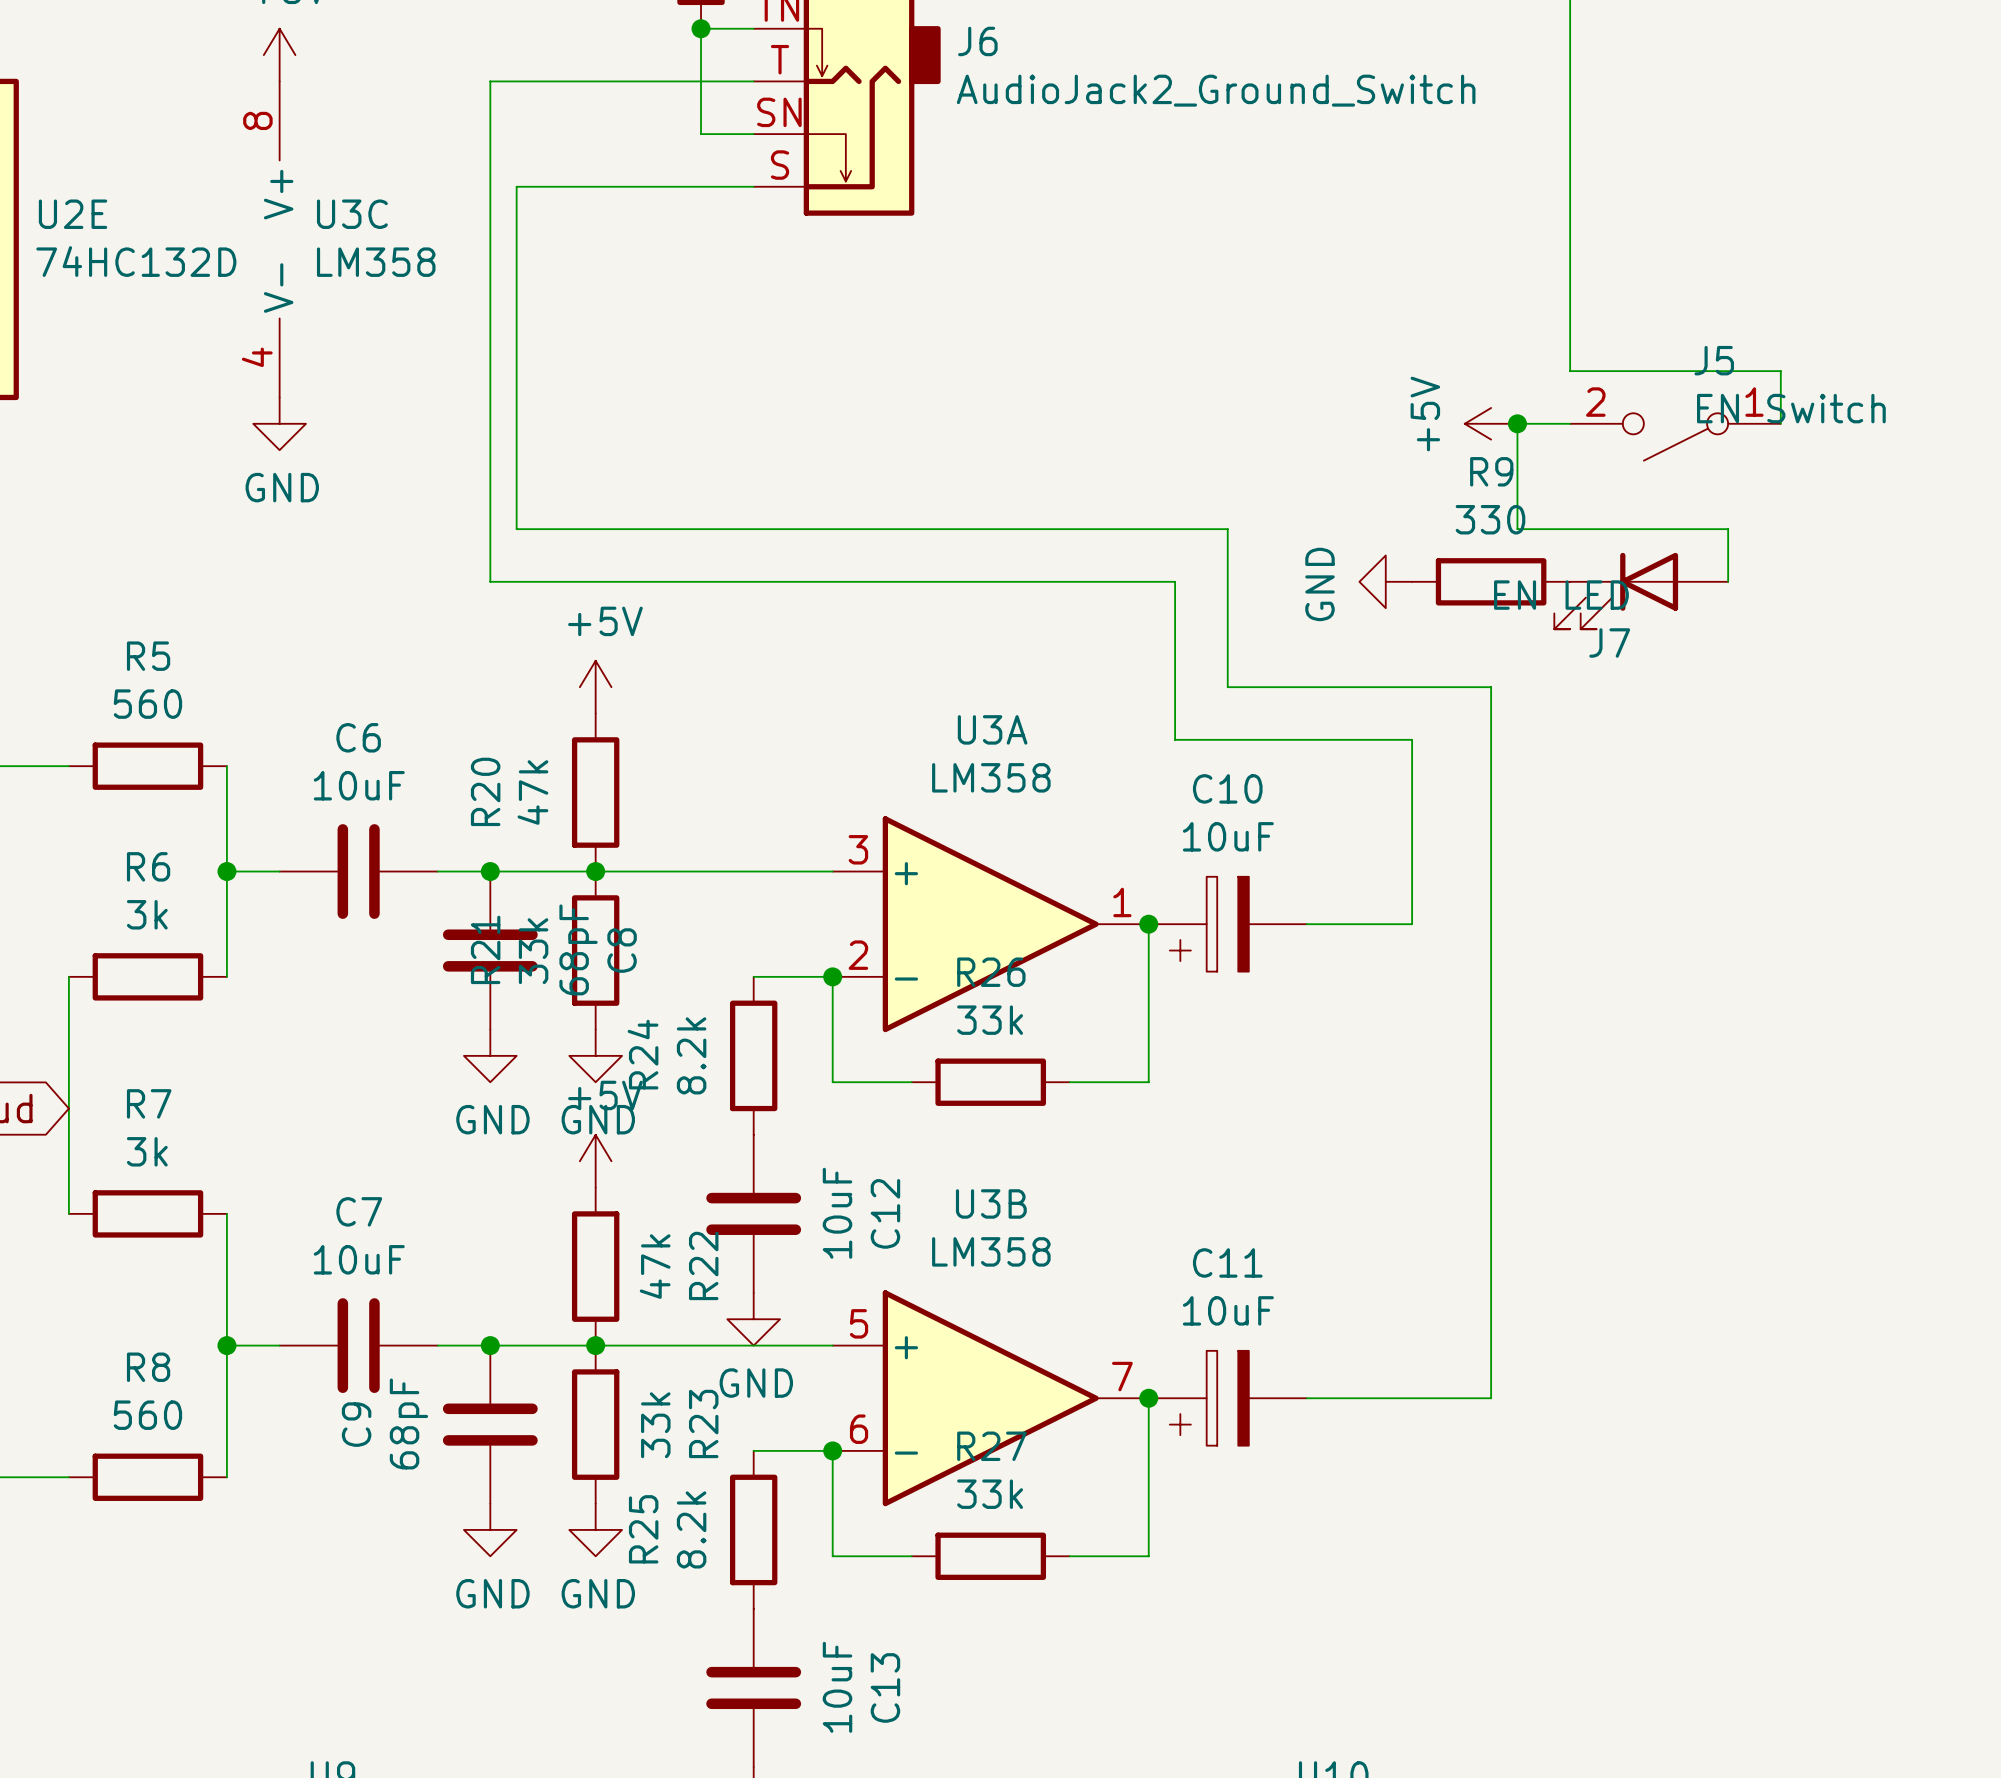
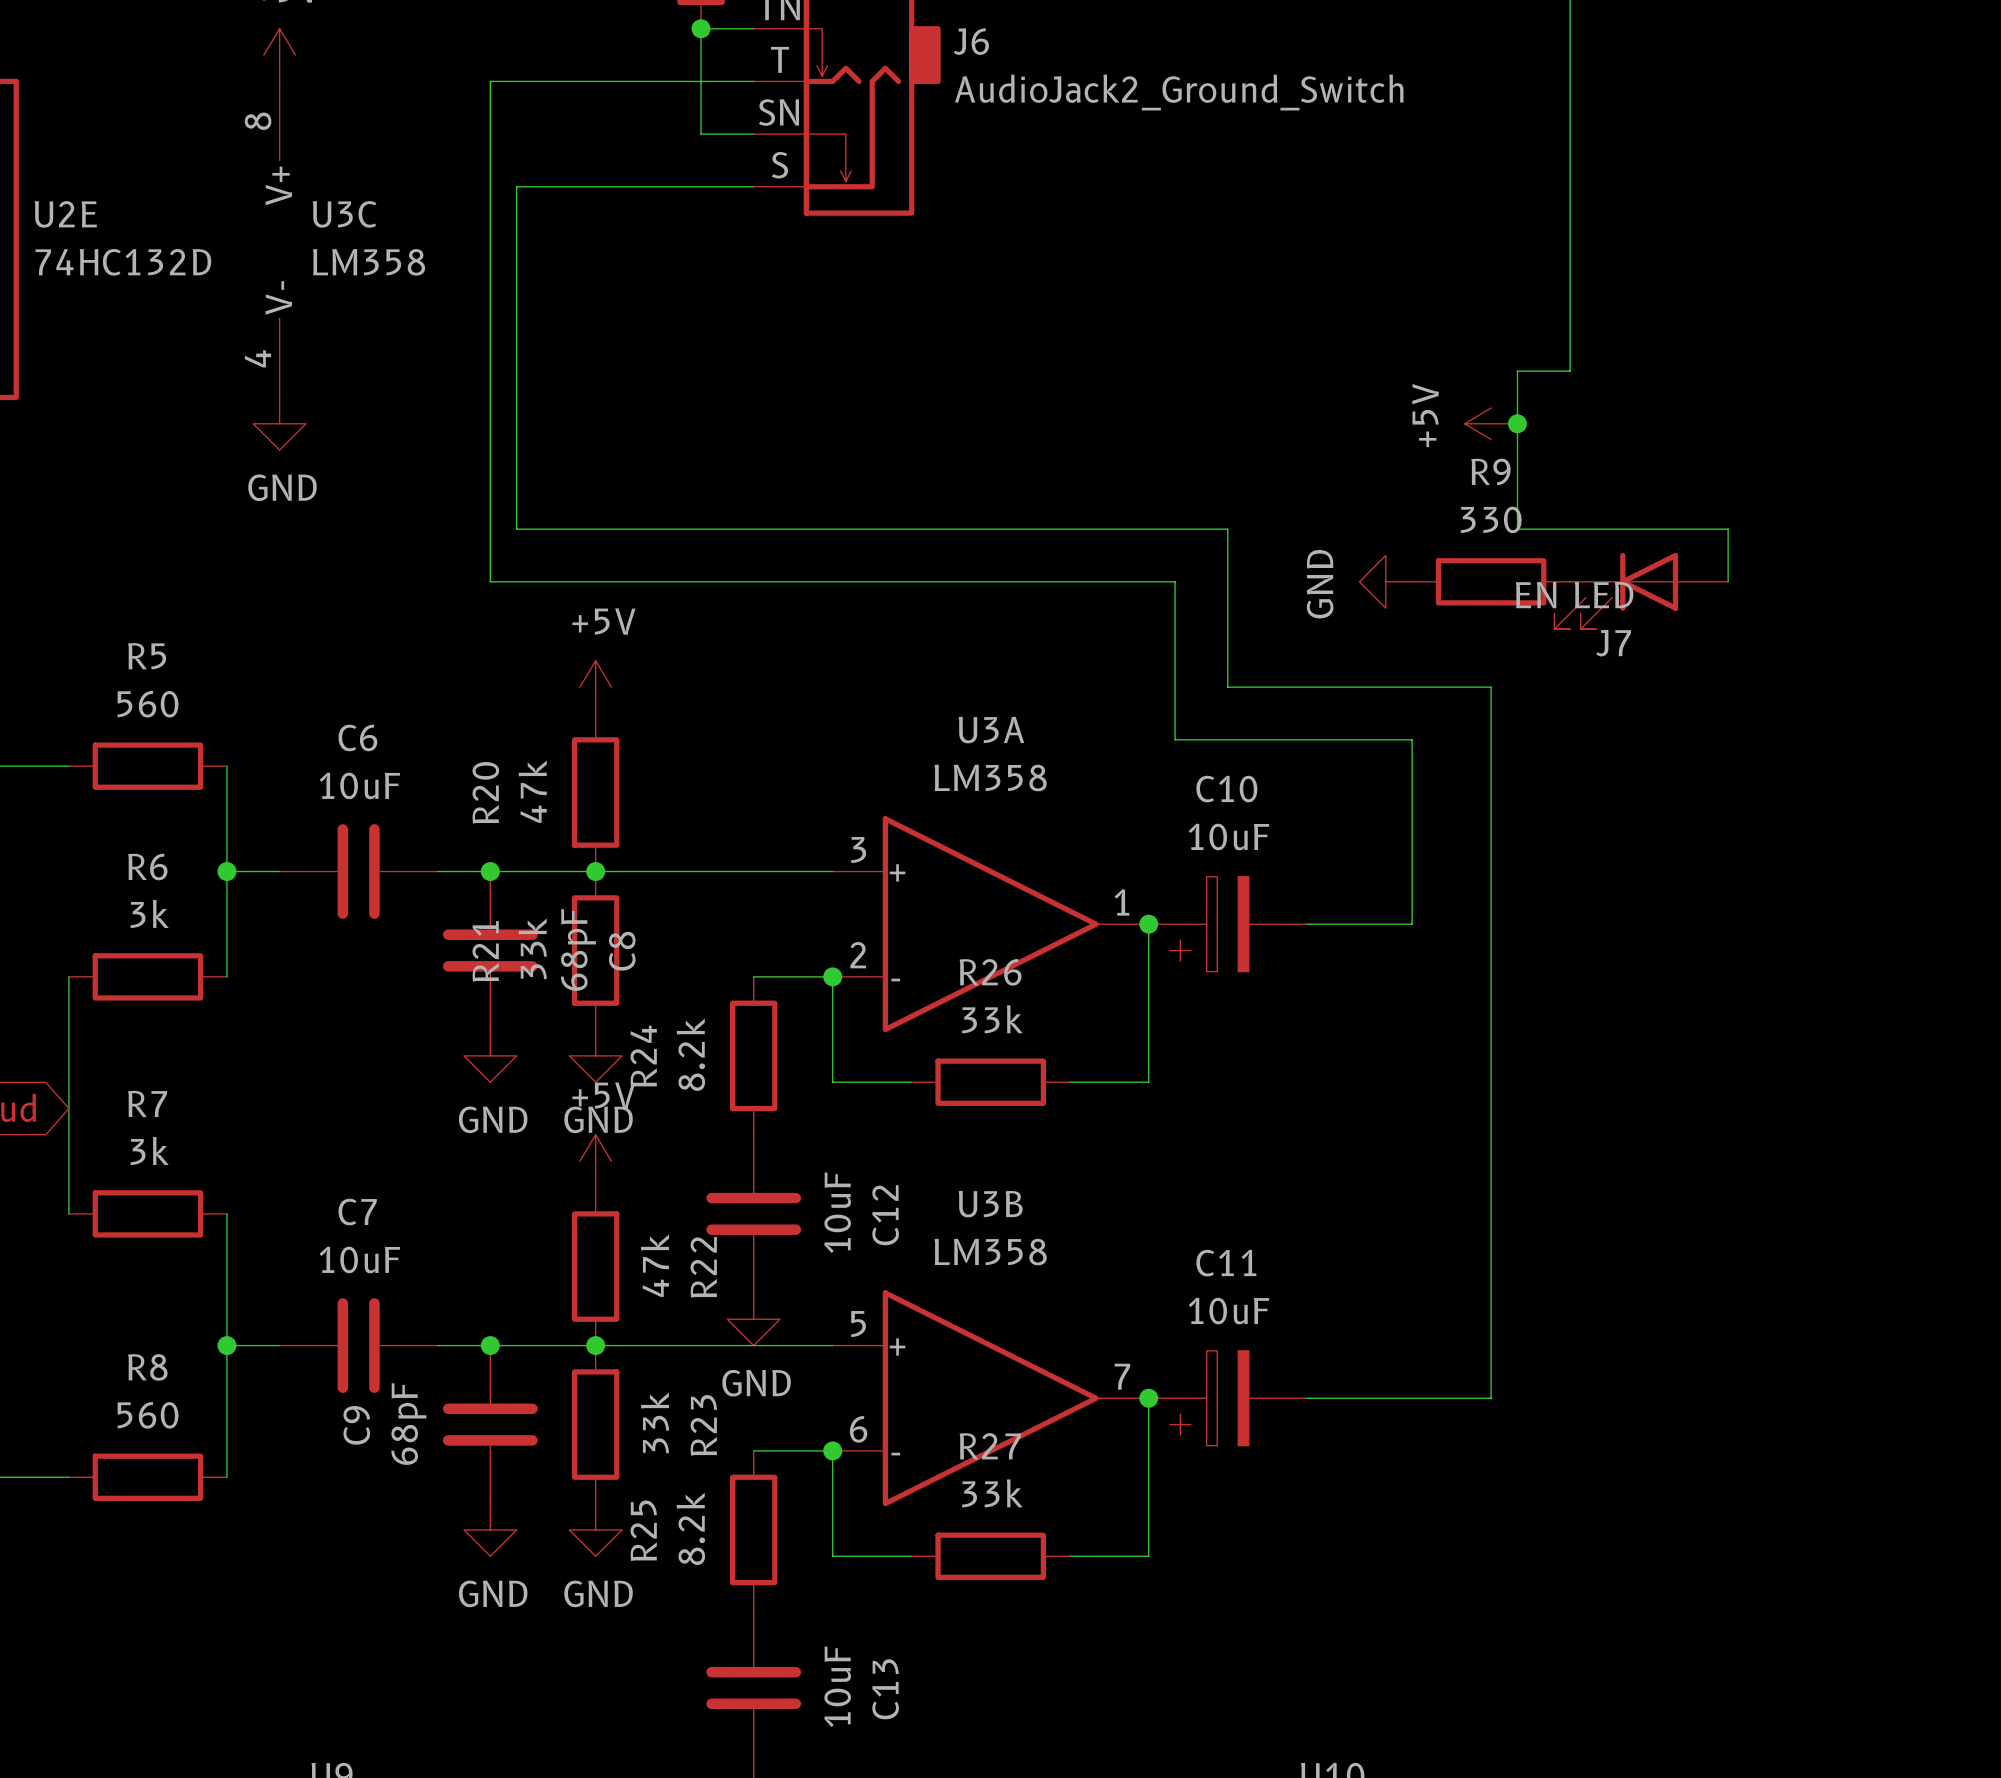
wire: (1570, 371) (1780, 371) (1780, 423) -> none
wire: (1517, 423) (1570, 423) -> (1517, 423) (1517, 371) (1570, 371)
J5: EN Switch (1675, 436) -> none

